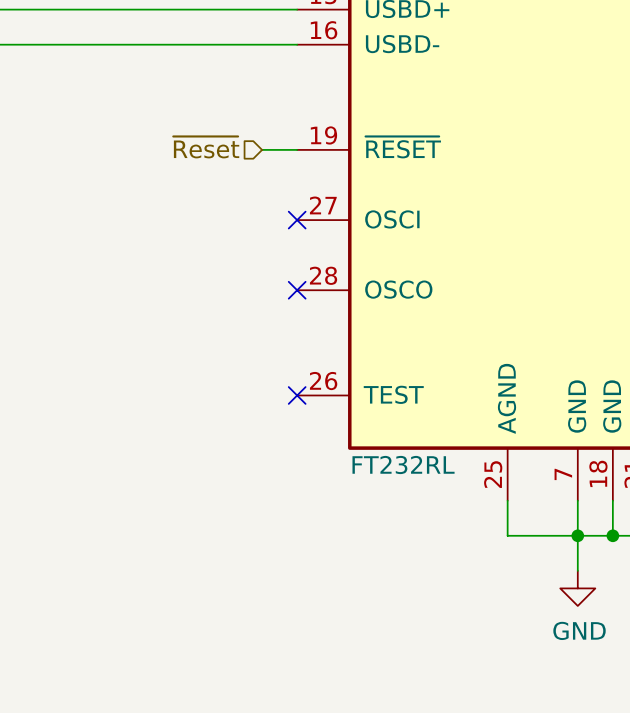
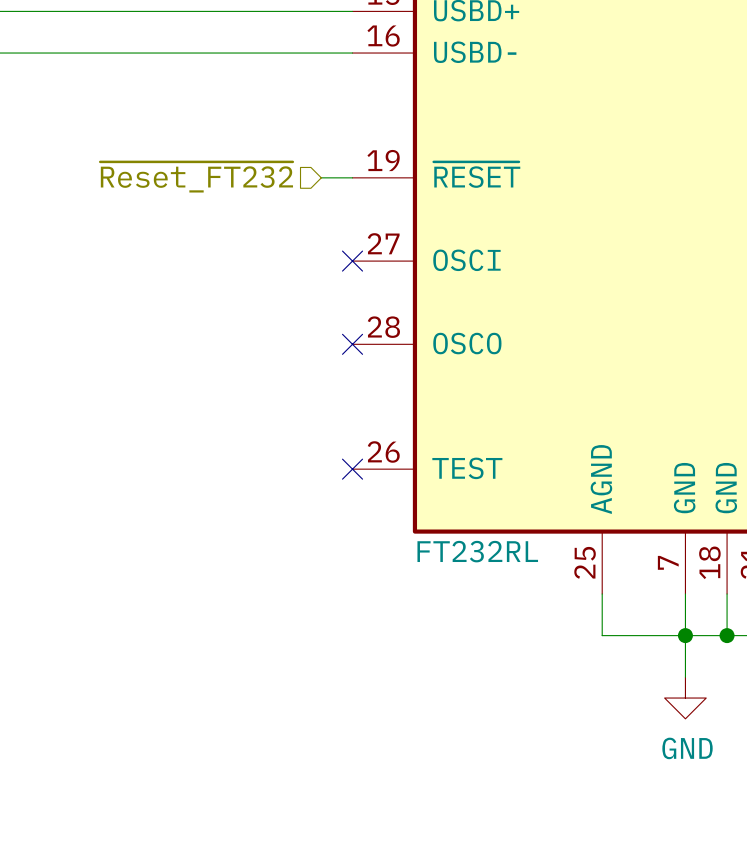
hierarchical label: ~{Reset} (206, 147) -> ~{Reset_FT232} (196, 177)
wire: (262, 149) (270, 149) -> none

